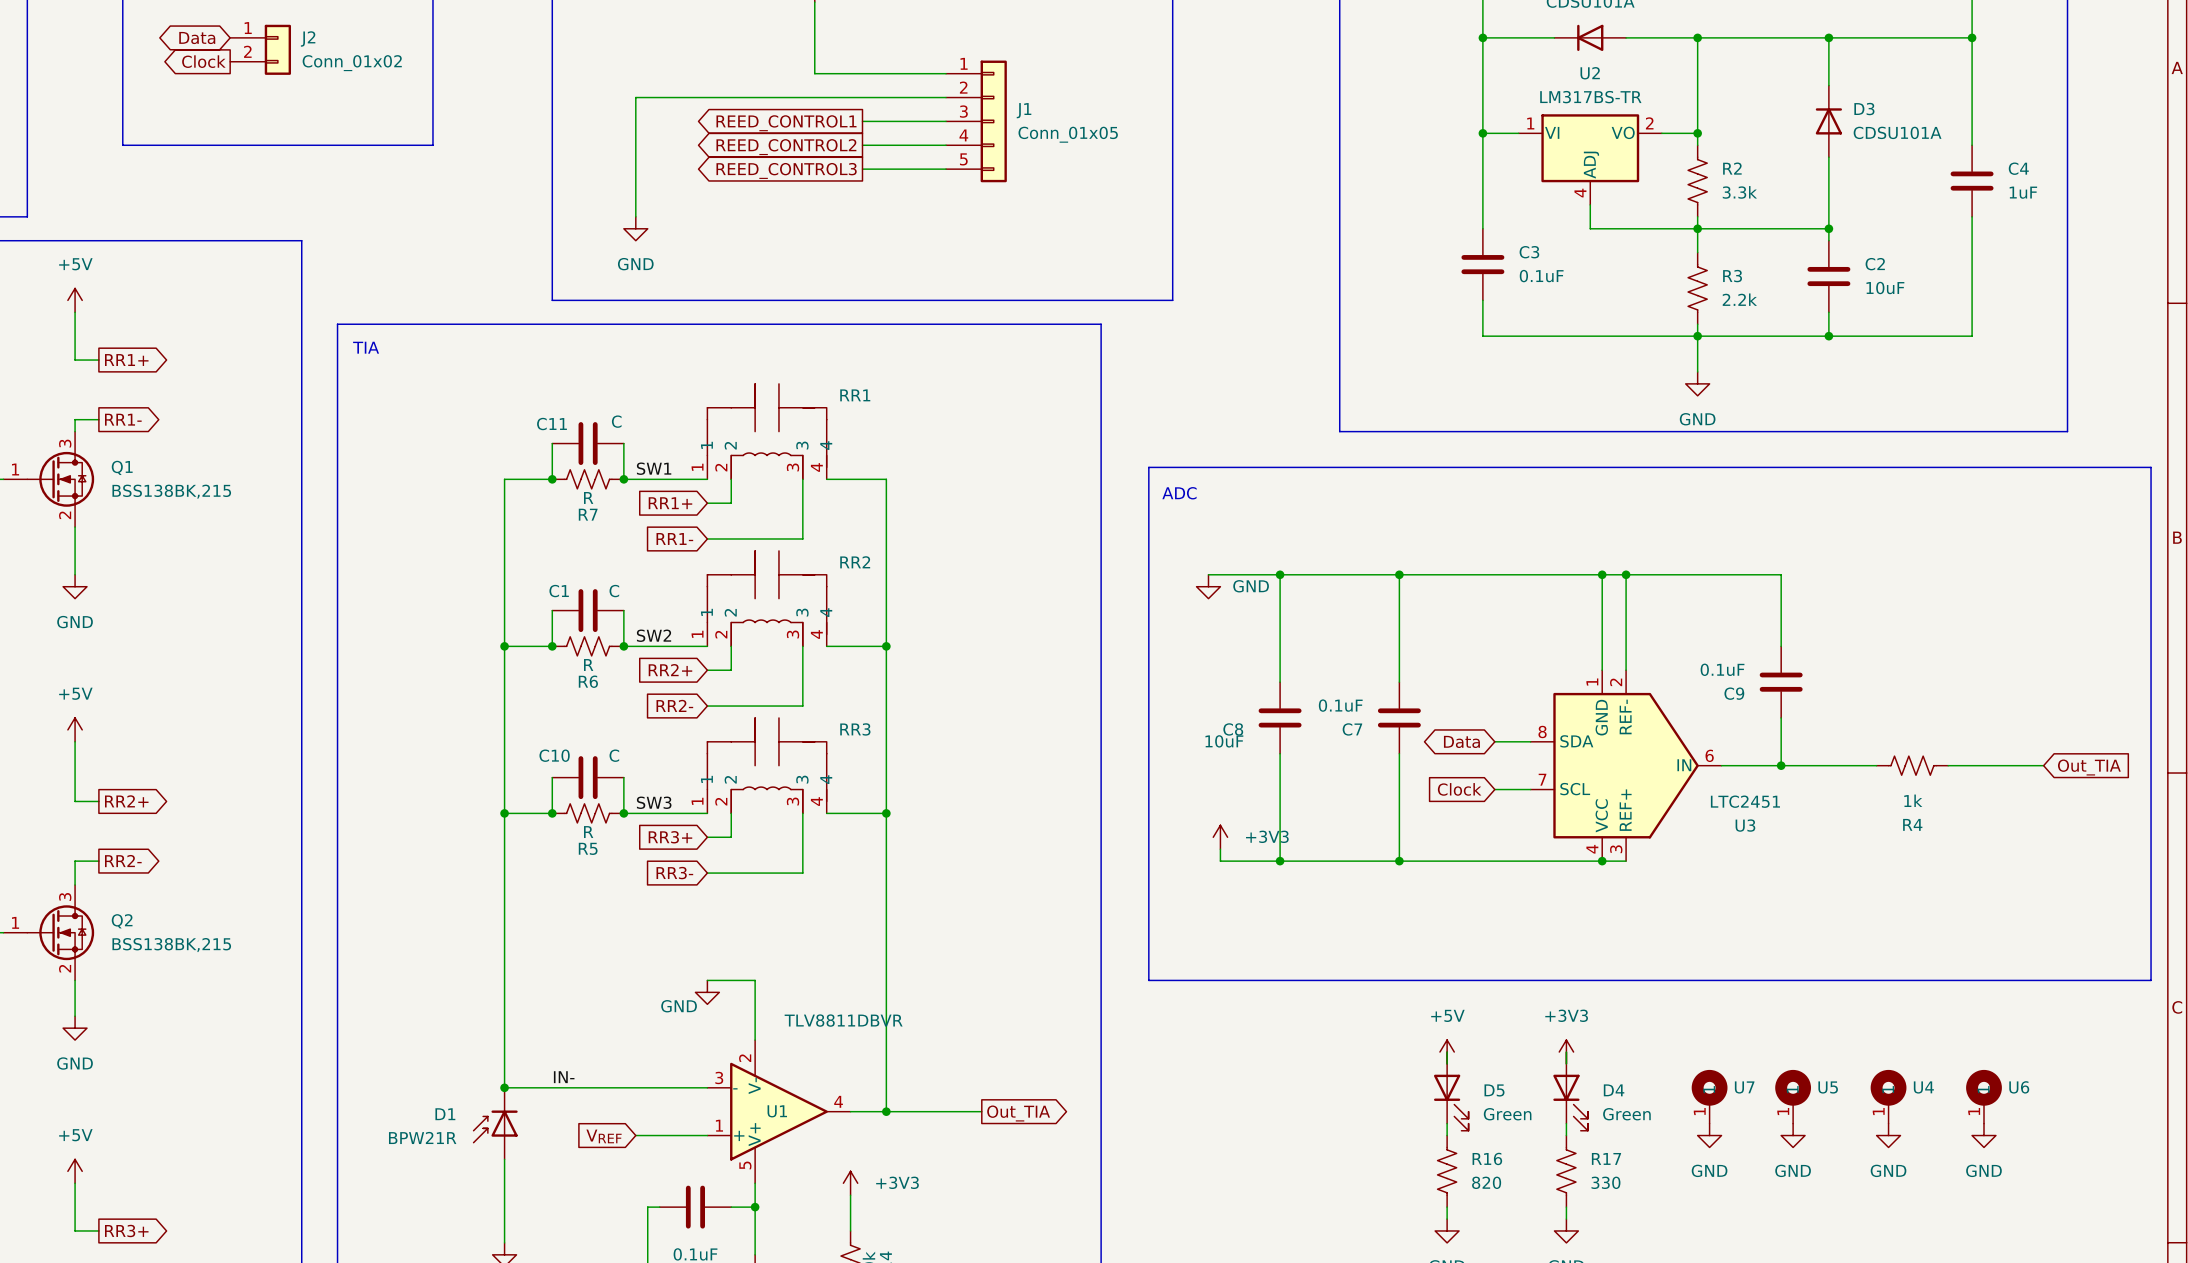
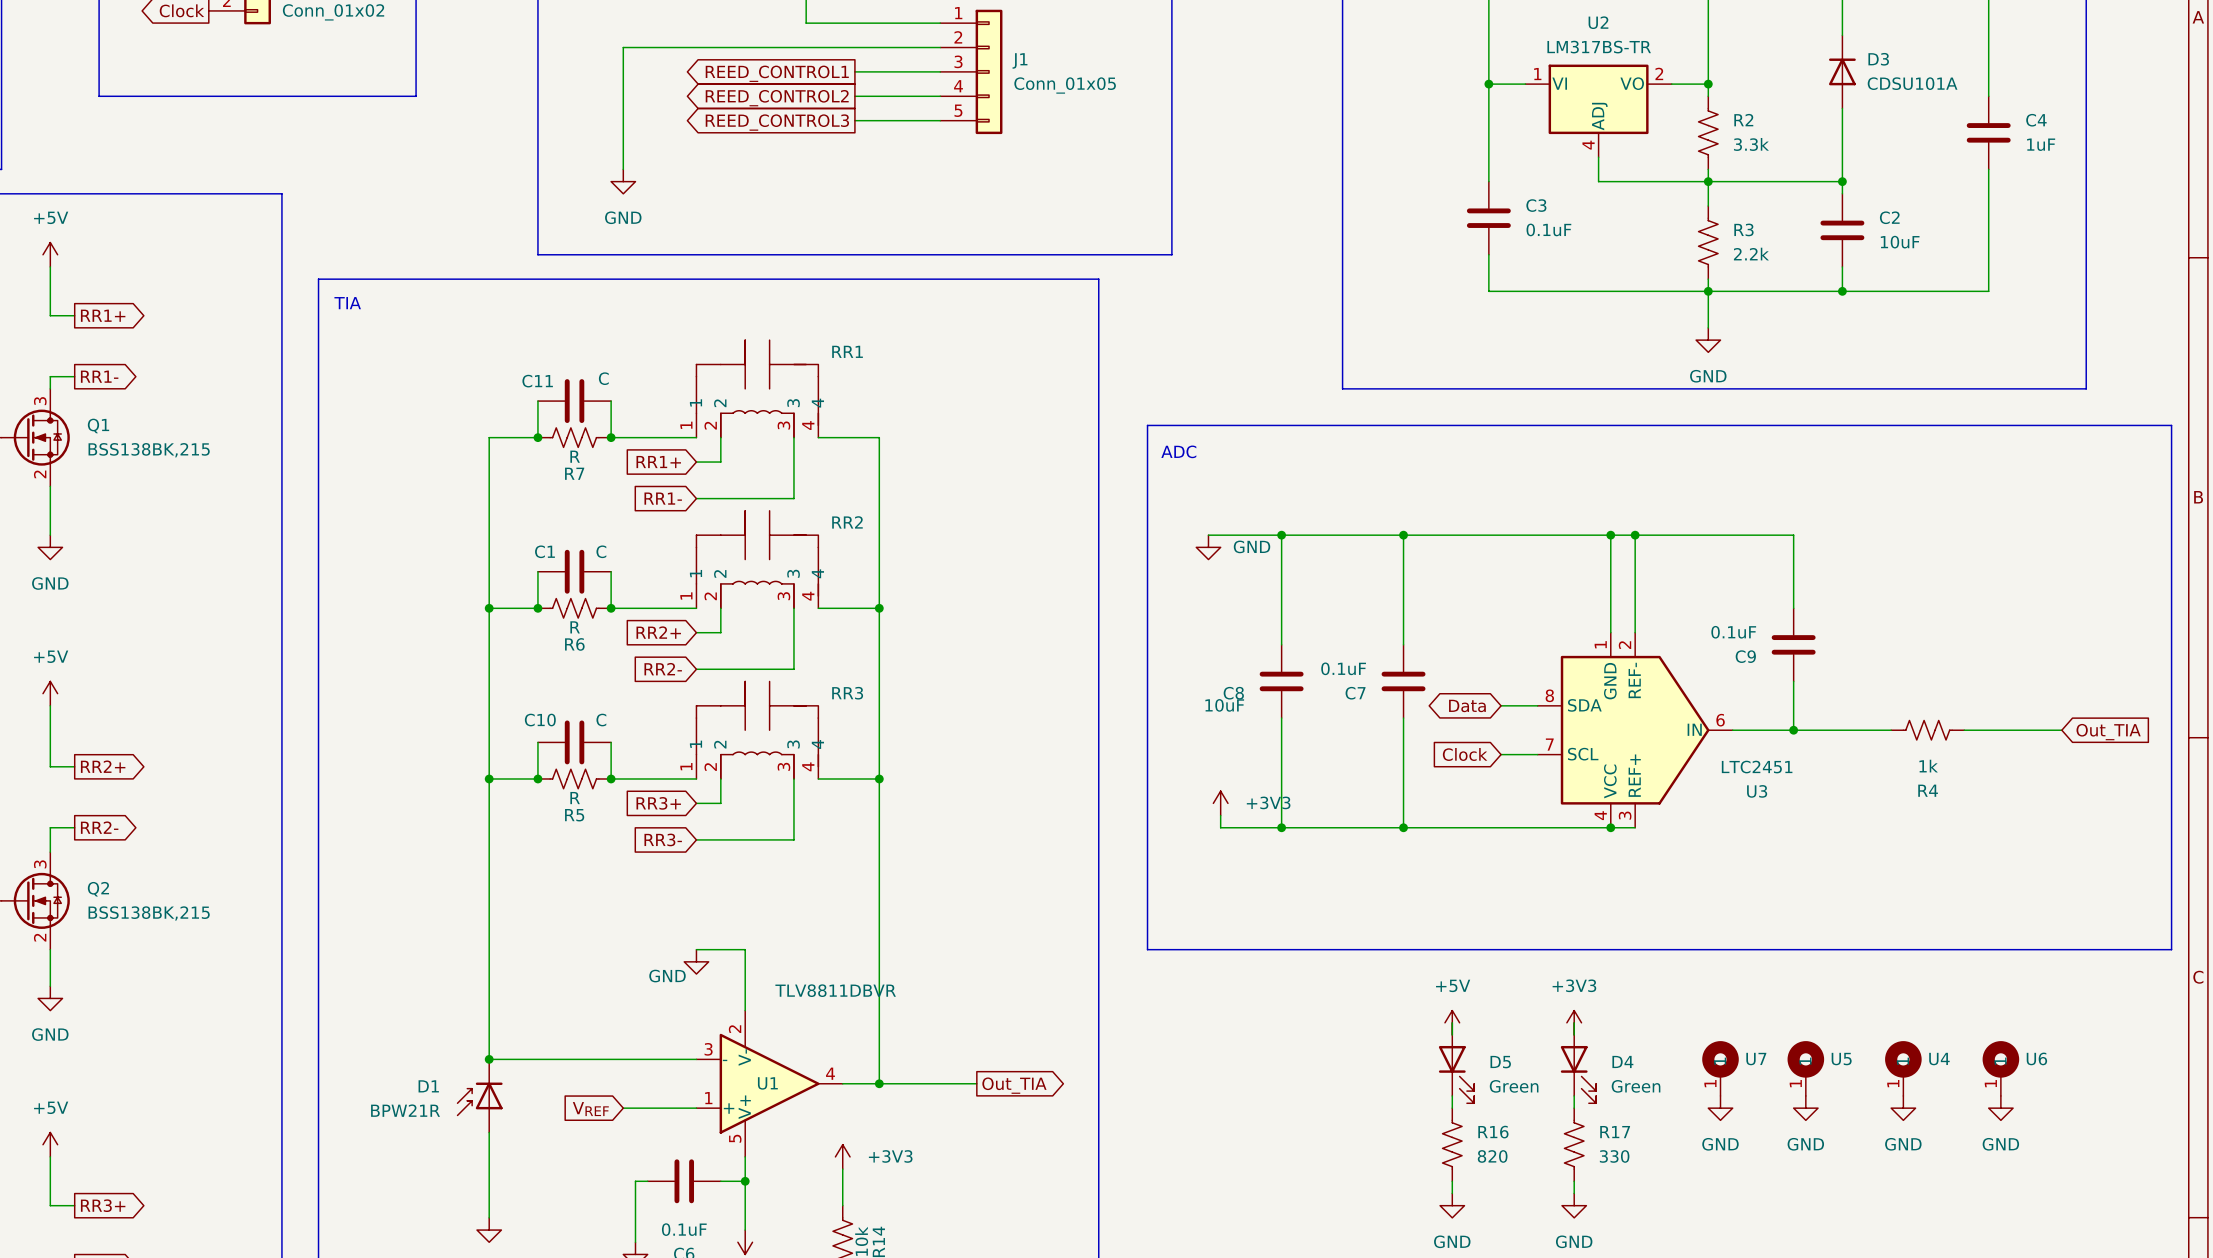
label: SW1 (654, 468) -> none
label: SW2 (654, 635) -> none
label: SW3 (654, 802) -> none
label: IN- (564, 1077) -> none

